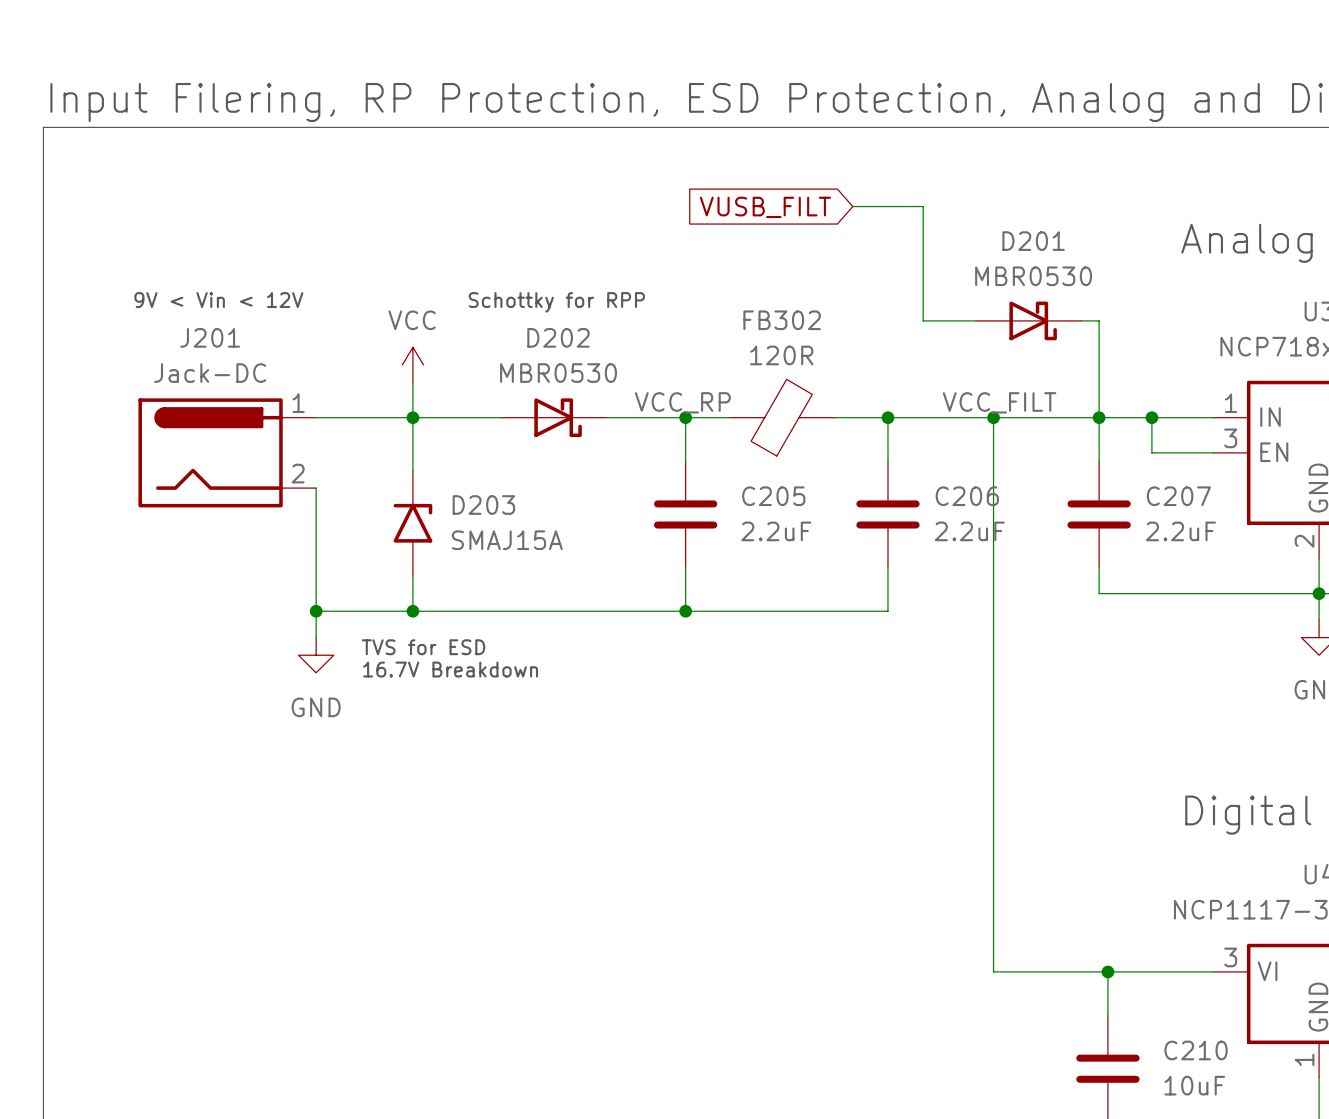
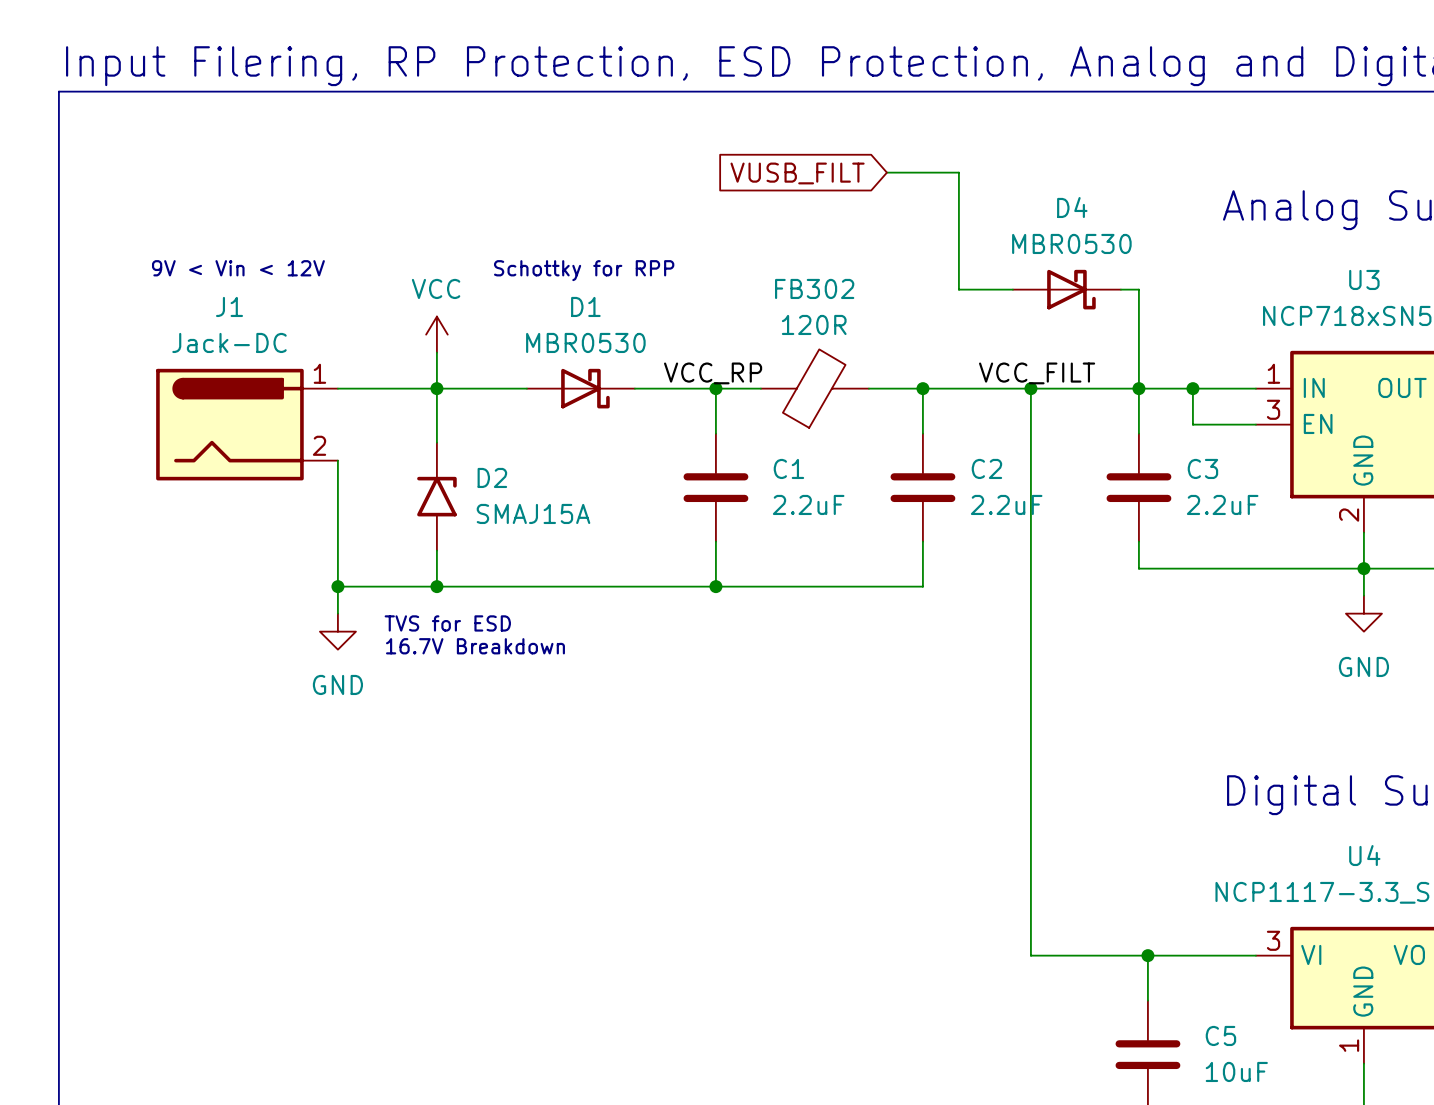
D201 name: D201 (1033, 241) -> D4 (1072, 207)
J201 name: J201 (210, 337) -> J1 (229, 306)
D202 name: D202 (558, 337) -> D1 (585, 306)
C205 name: C205 (773, 496) -> C1 (788, 468)
C206 name: C206 (967, 496) -> C2 (986, 468)
C207 name: C207 (1178, 496) -> C3 (1202, 468)
D203 name: D203 (483, 505) -> D2 (492, 477)
C210 name: C210 (1196, 1050) -> C5 (1220, 1035)

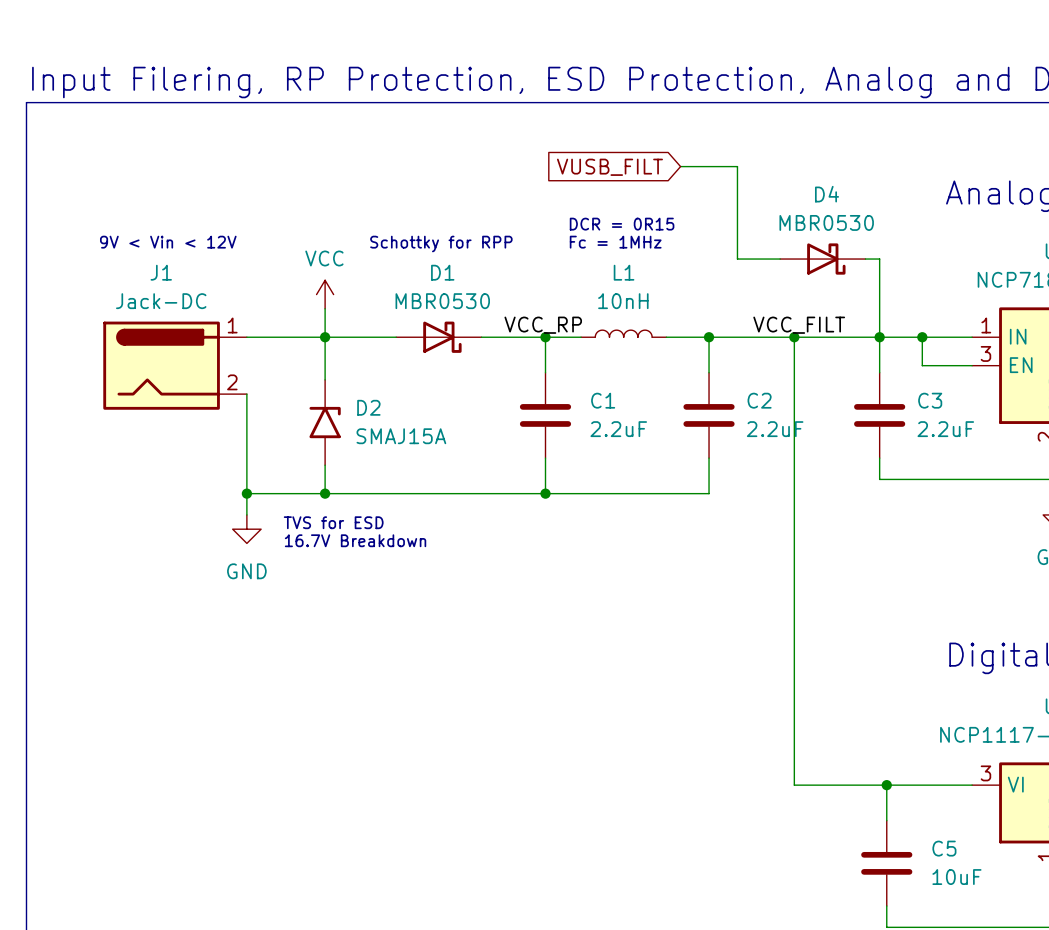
text: none -> DCR = 0R15 (622, 224)
text: none -> Fc = 1MHz (615, 242)
L1: none -> 10nH (623, 333)
FB302: 120R (814, 388) -> none

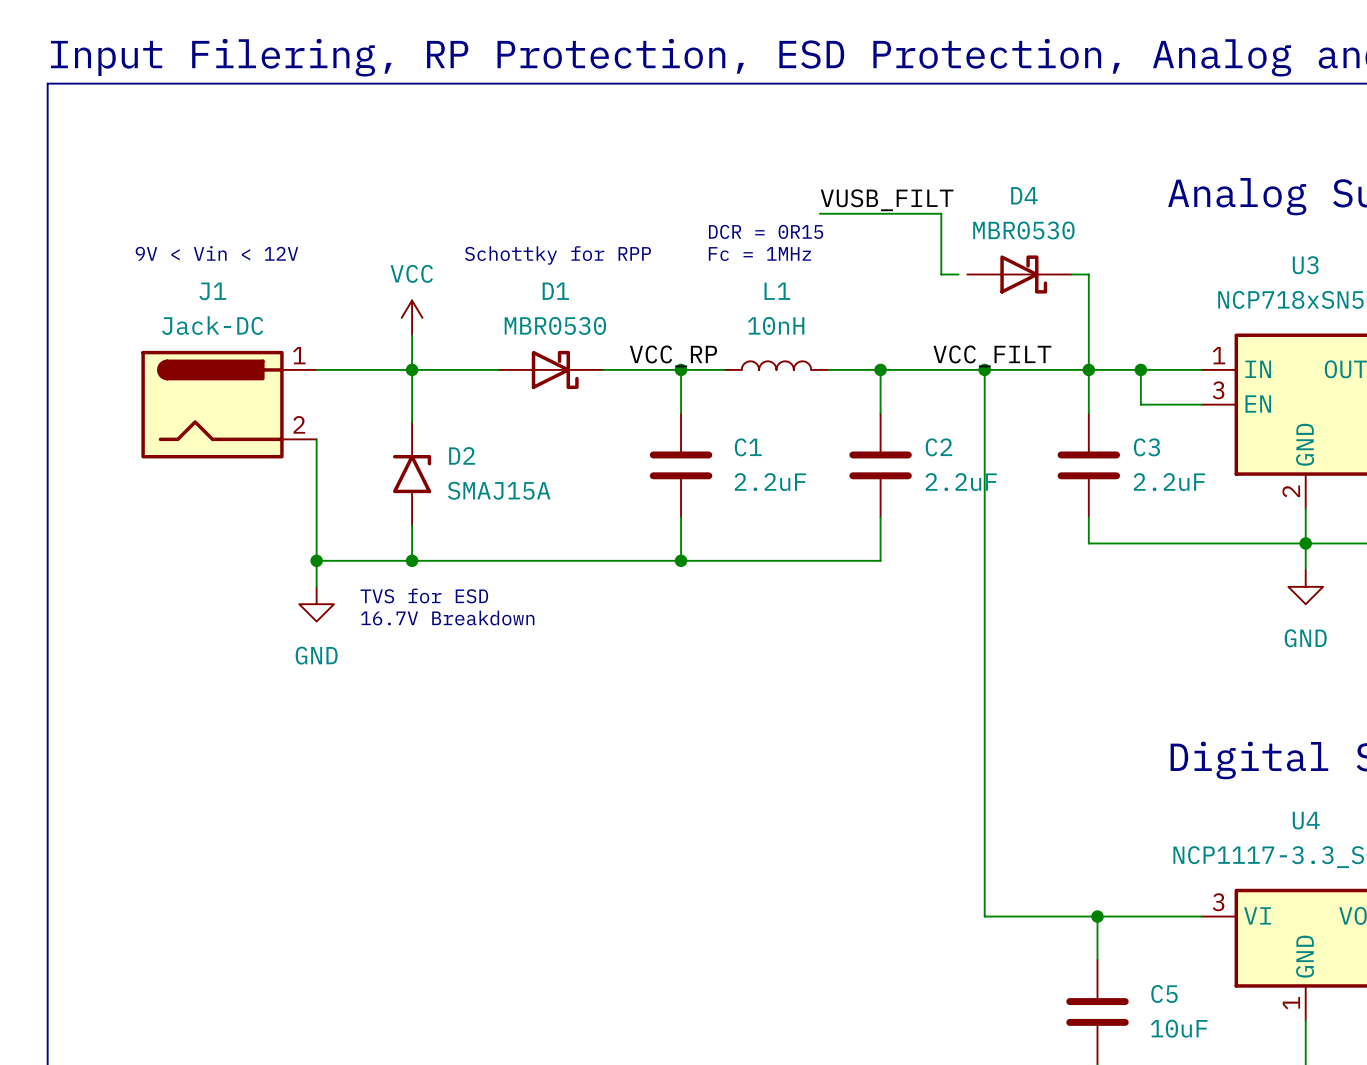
wire: (680, 166) (737, 166) (737, 259) (758, 259) -> (819, 213) (941, 213) (941, 274)
global label: VUSB_FILT (609, 167) -> none
label: none -> VUSB_FILT (887, 200)
wire: (773, 259) (780, 259) -> none

